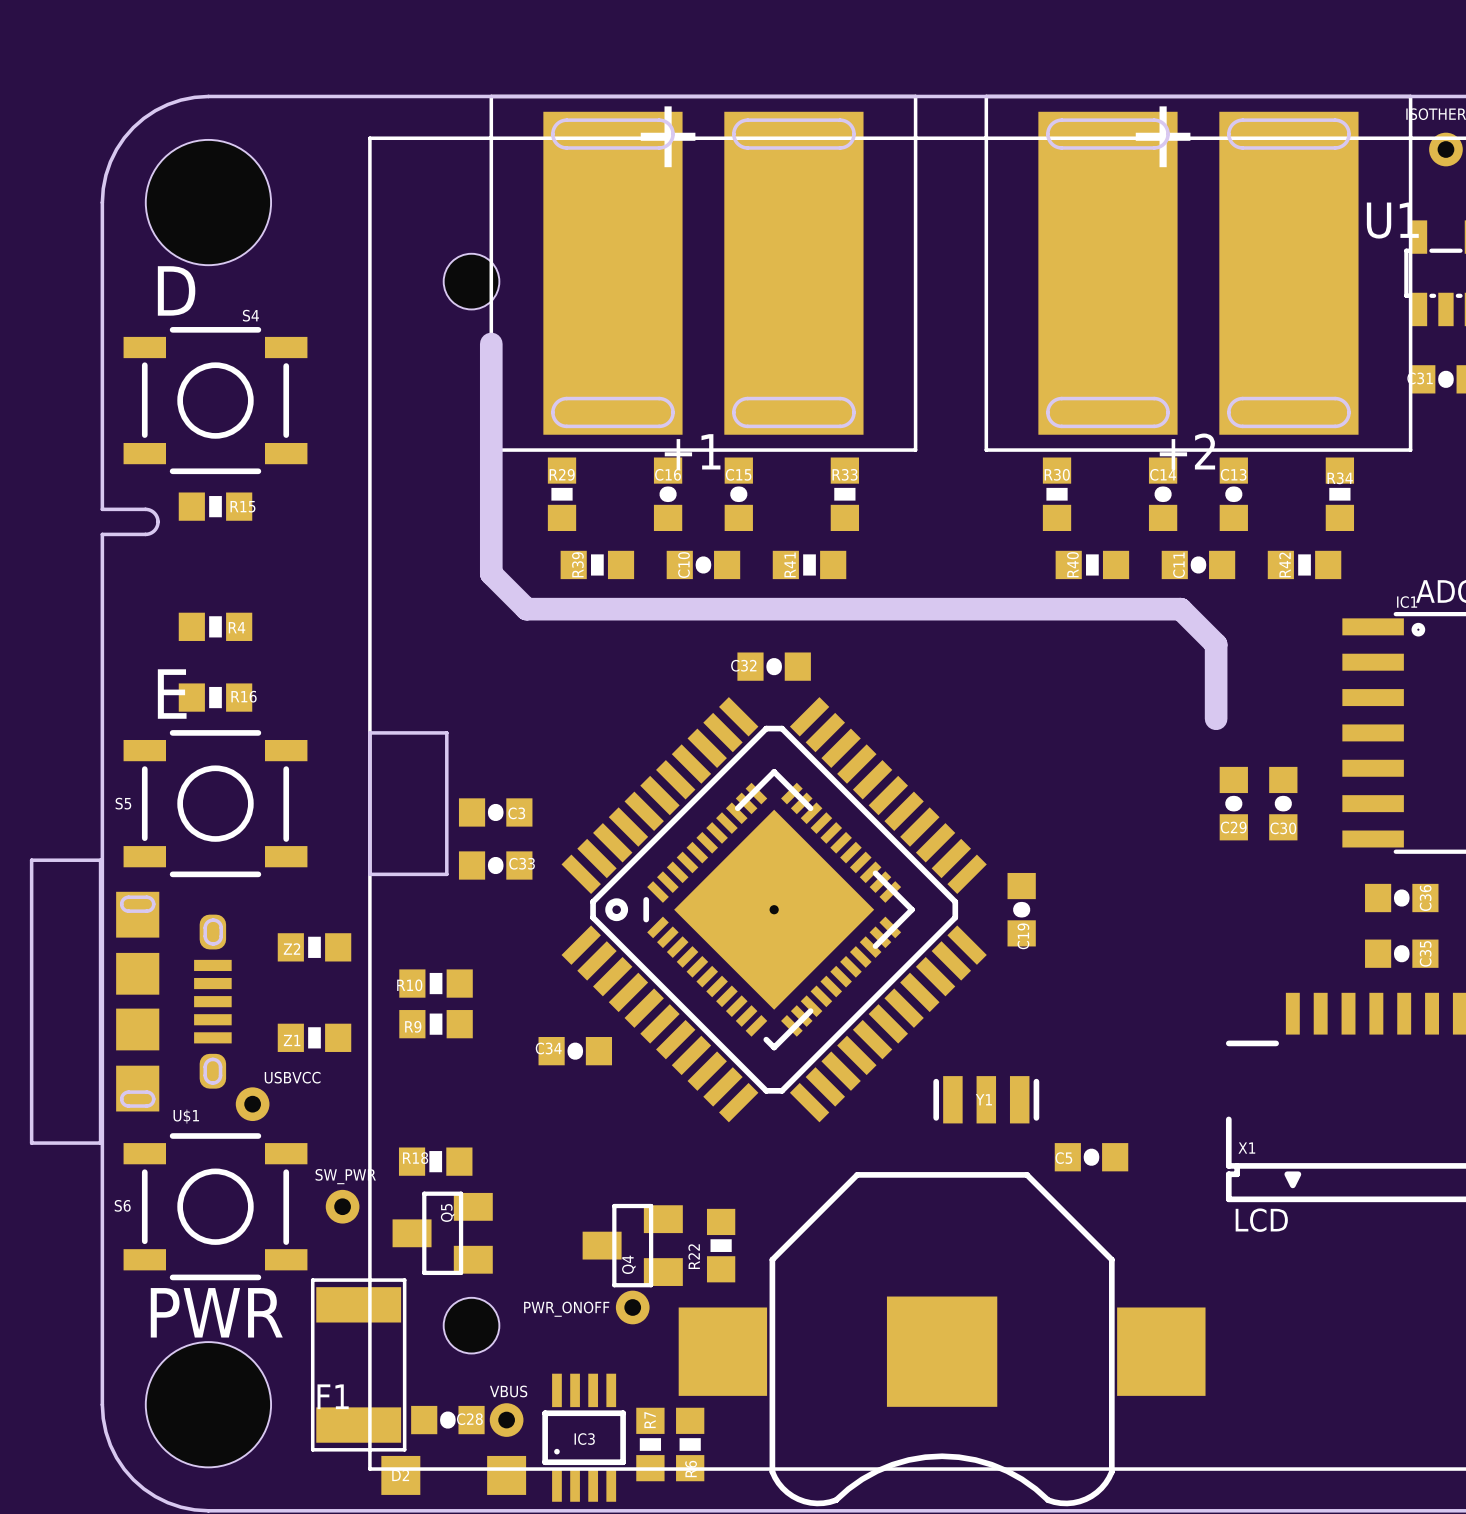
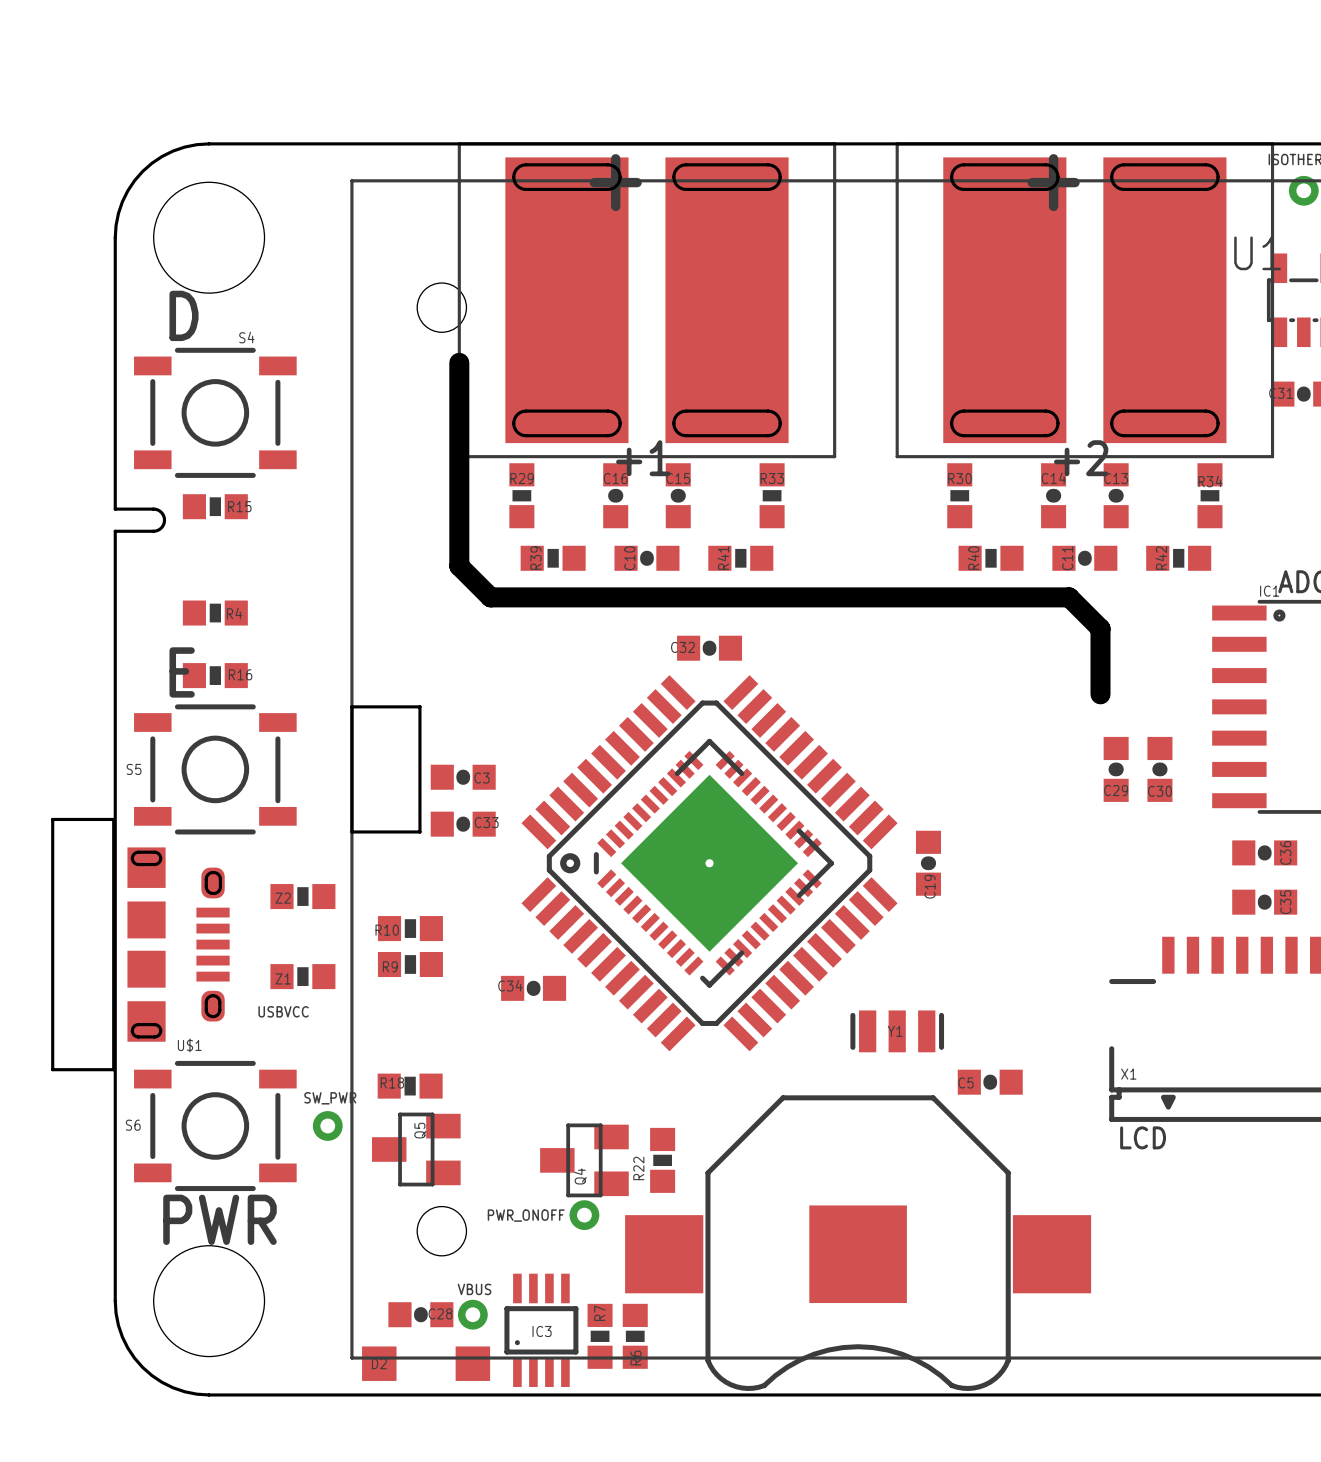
part: (252, 1104) -> none
F1: (358, 1364) -> none

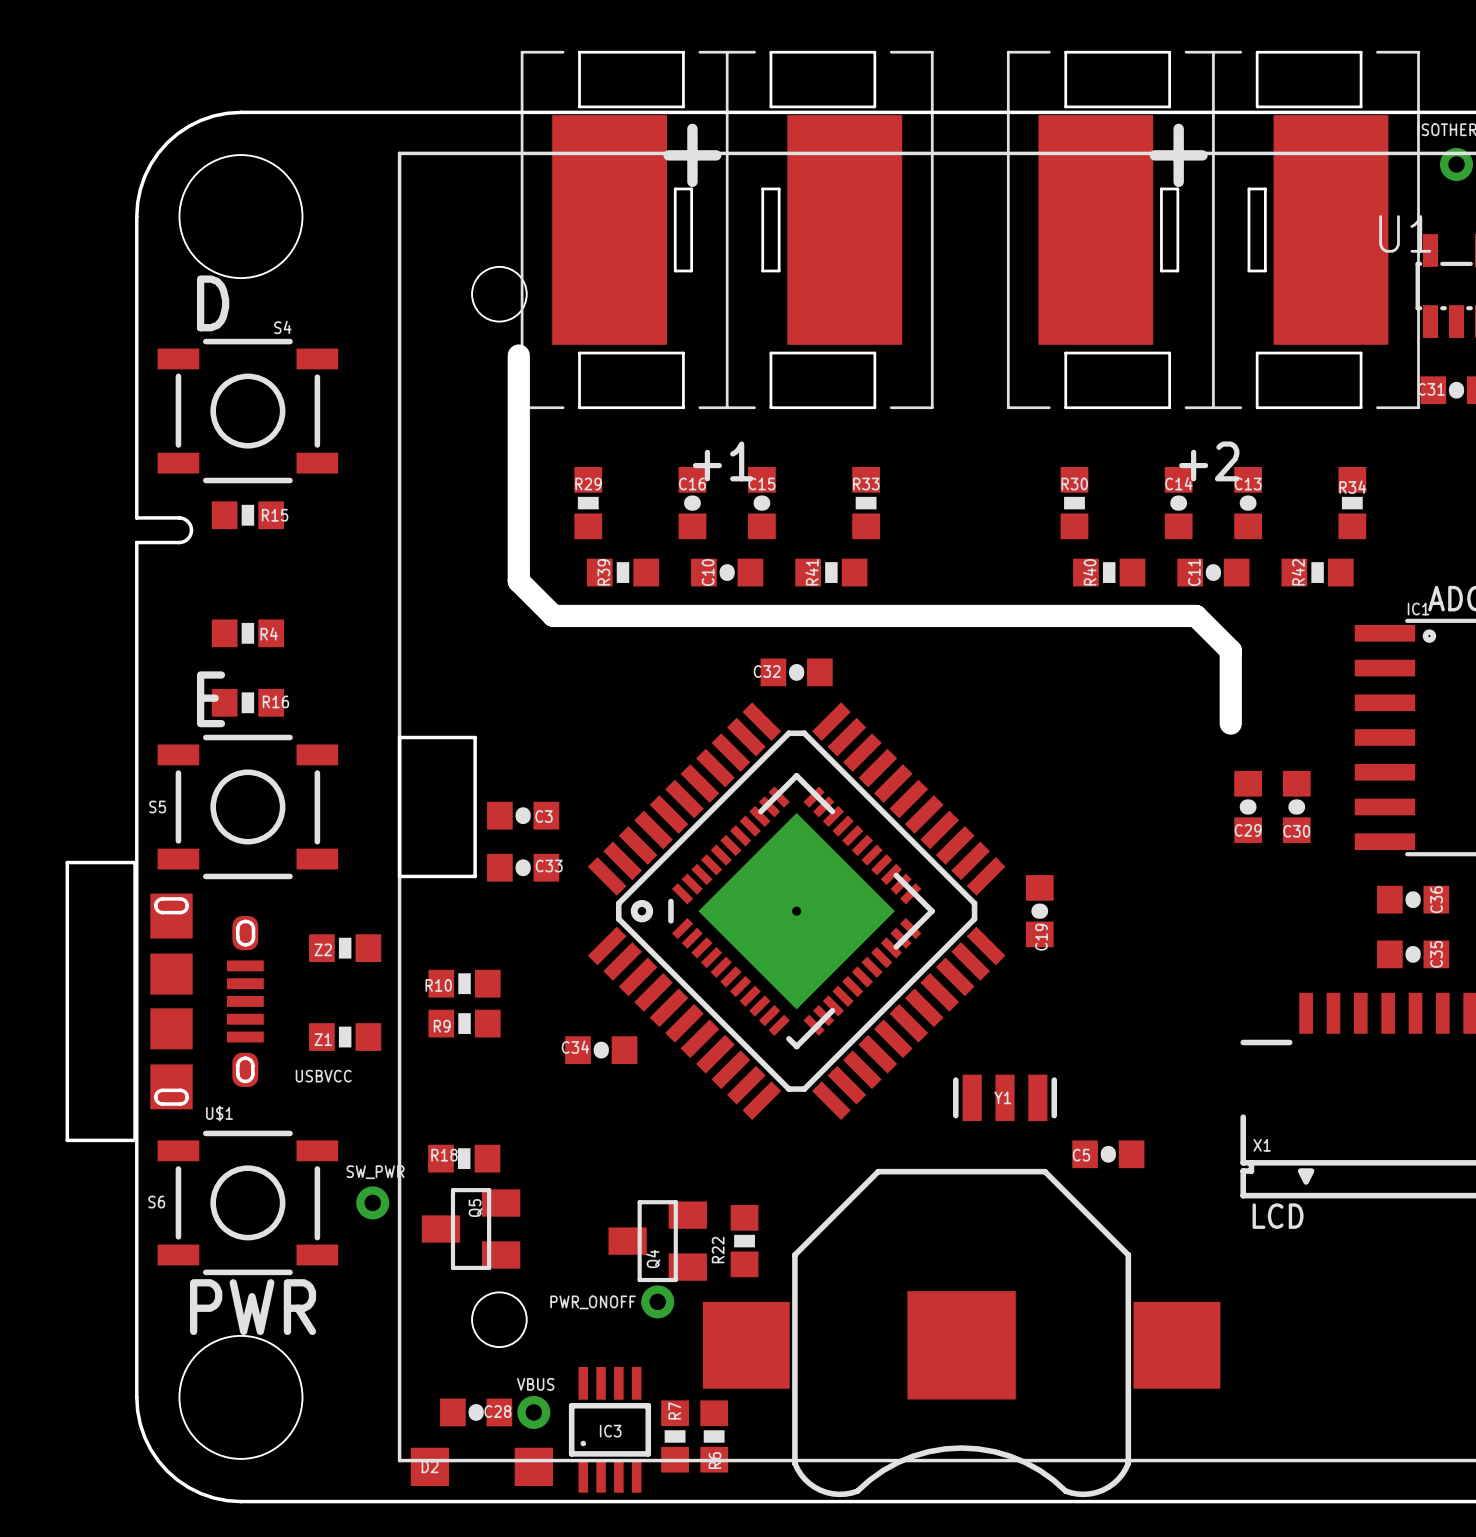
part: none -> (727, 229)
part: none -> (1213, 229)
part: (646, 300) -> none
part: (1084, 300) -> none

